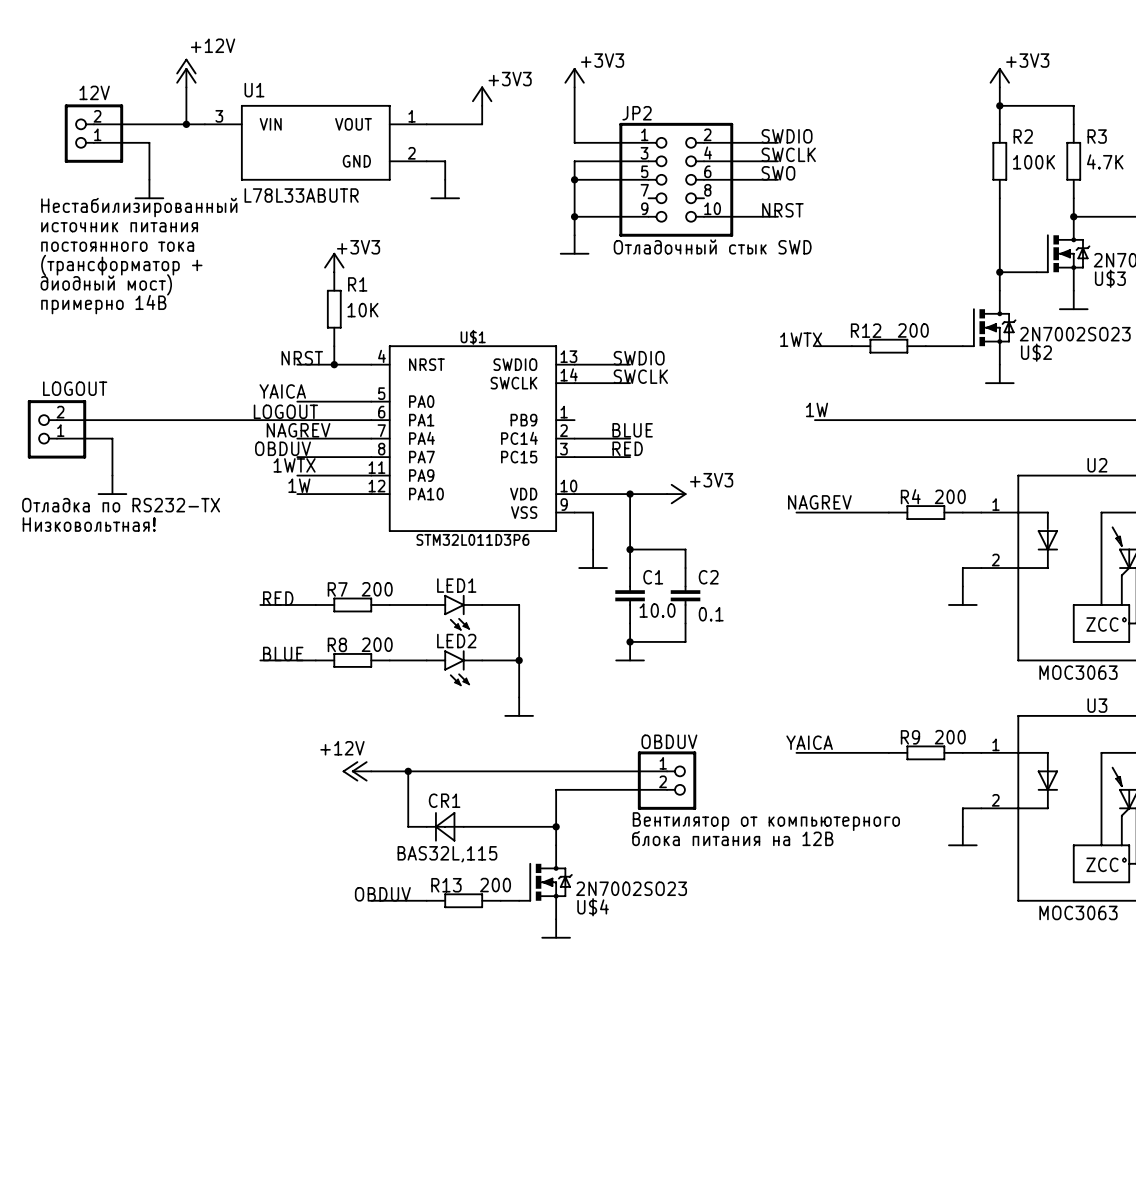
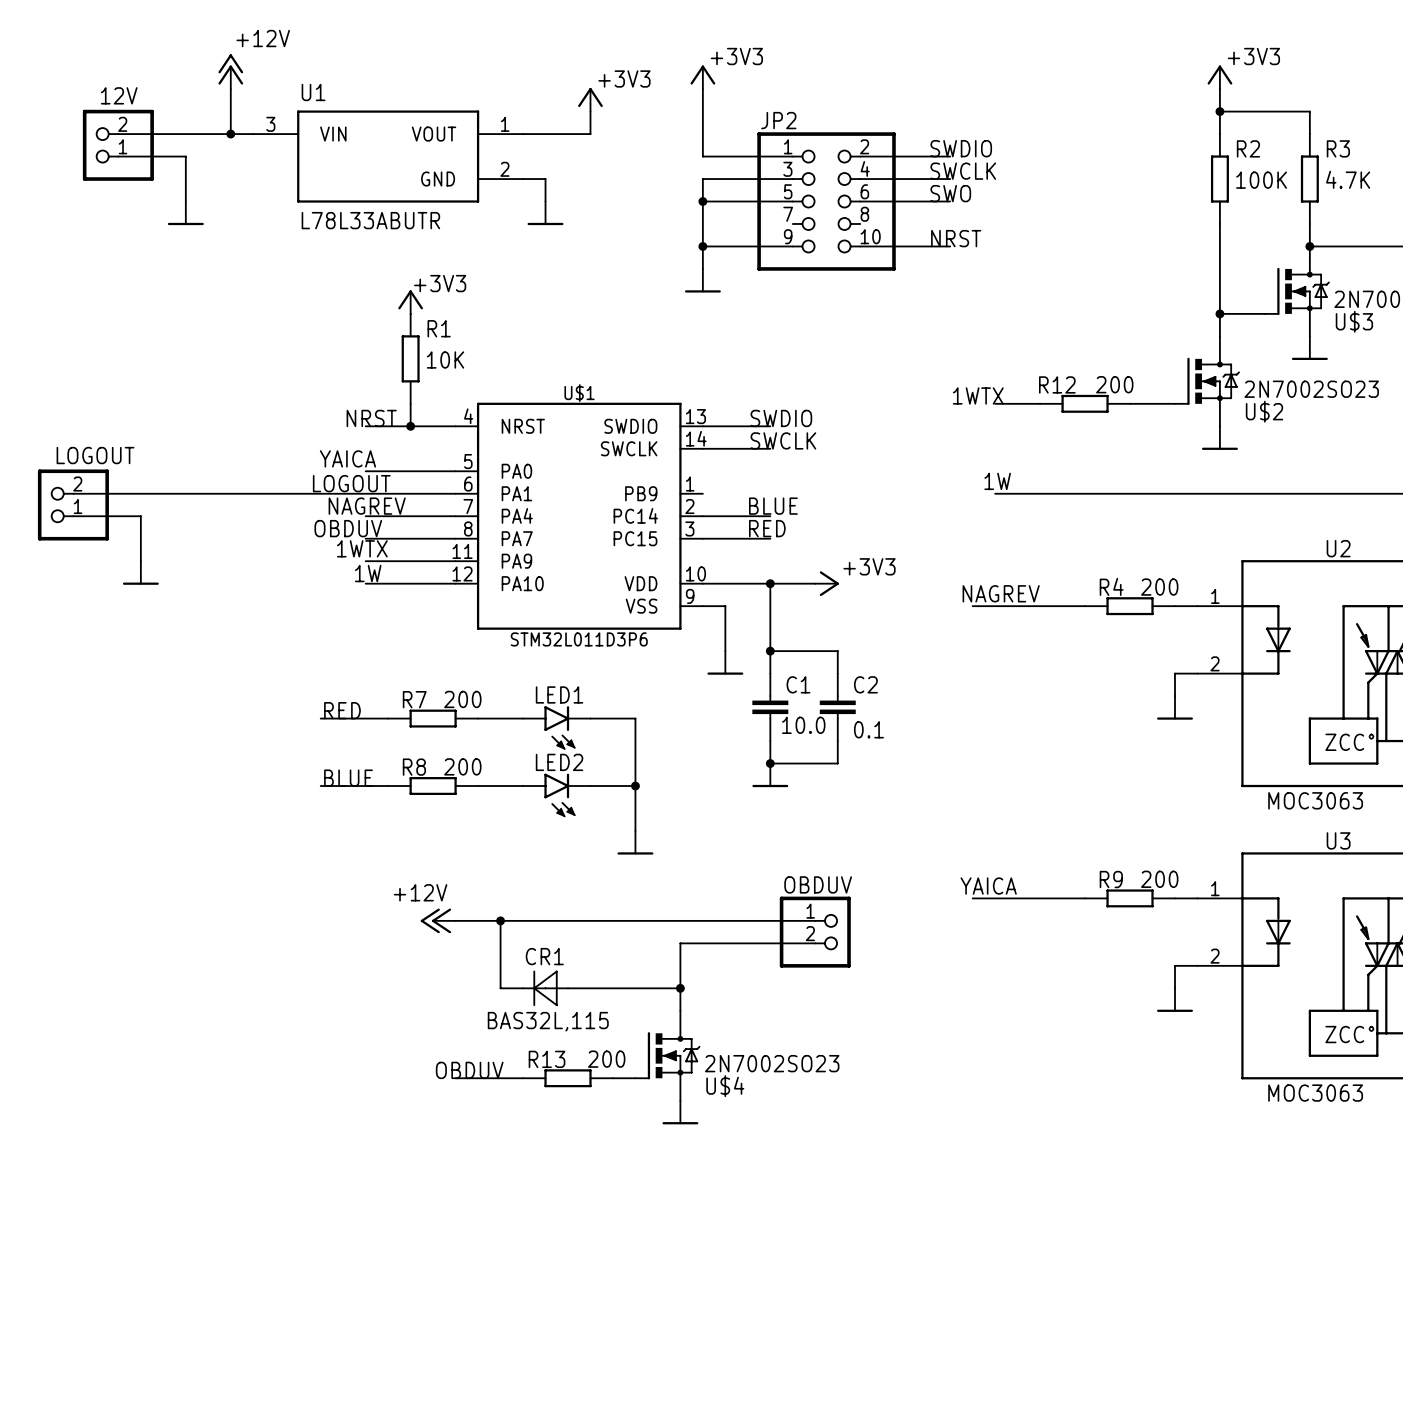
text: Нестабилизированный (139, 207) -> none
text: источник питания (119, 227) -> none
text: постоянного тока (117, 246) -> none
text: Отладочный стык SWD (712, 246) -> none
text: (трансформатор + (121, 265) -> none
text: диодный мост) (106, 284) -> none
text: примерно 14В (103, 304) -> none
text: Отладка по RS232-TX (121, 505) -> none
text: Низковольтная! (89, 524) -> none
text: Вентилятор от компьютерного (766, 821) -> none
text: блока питания на 12В (732, 838) -> none

